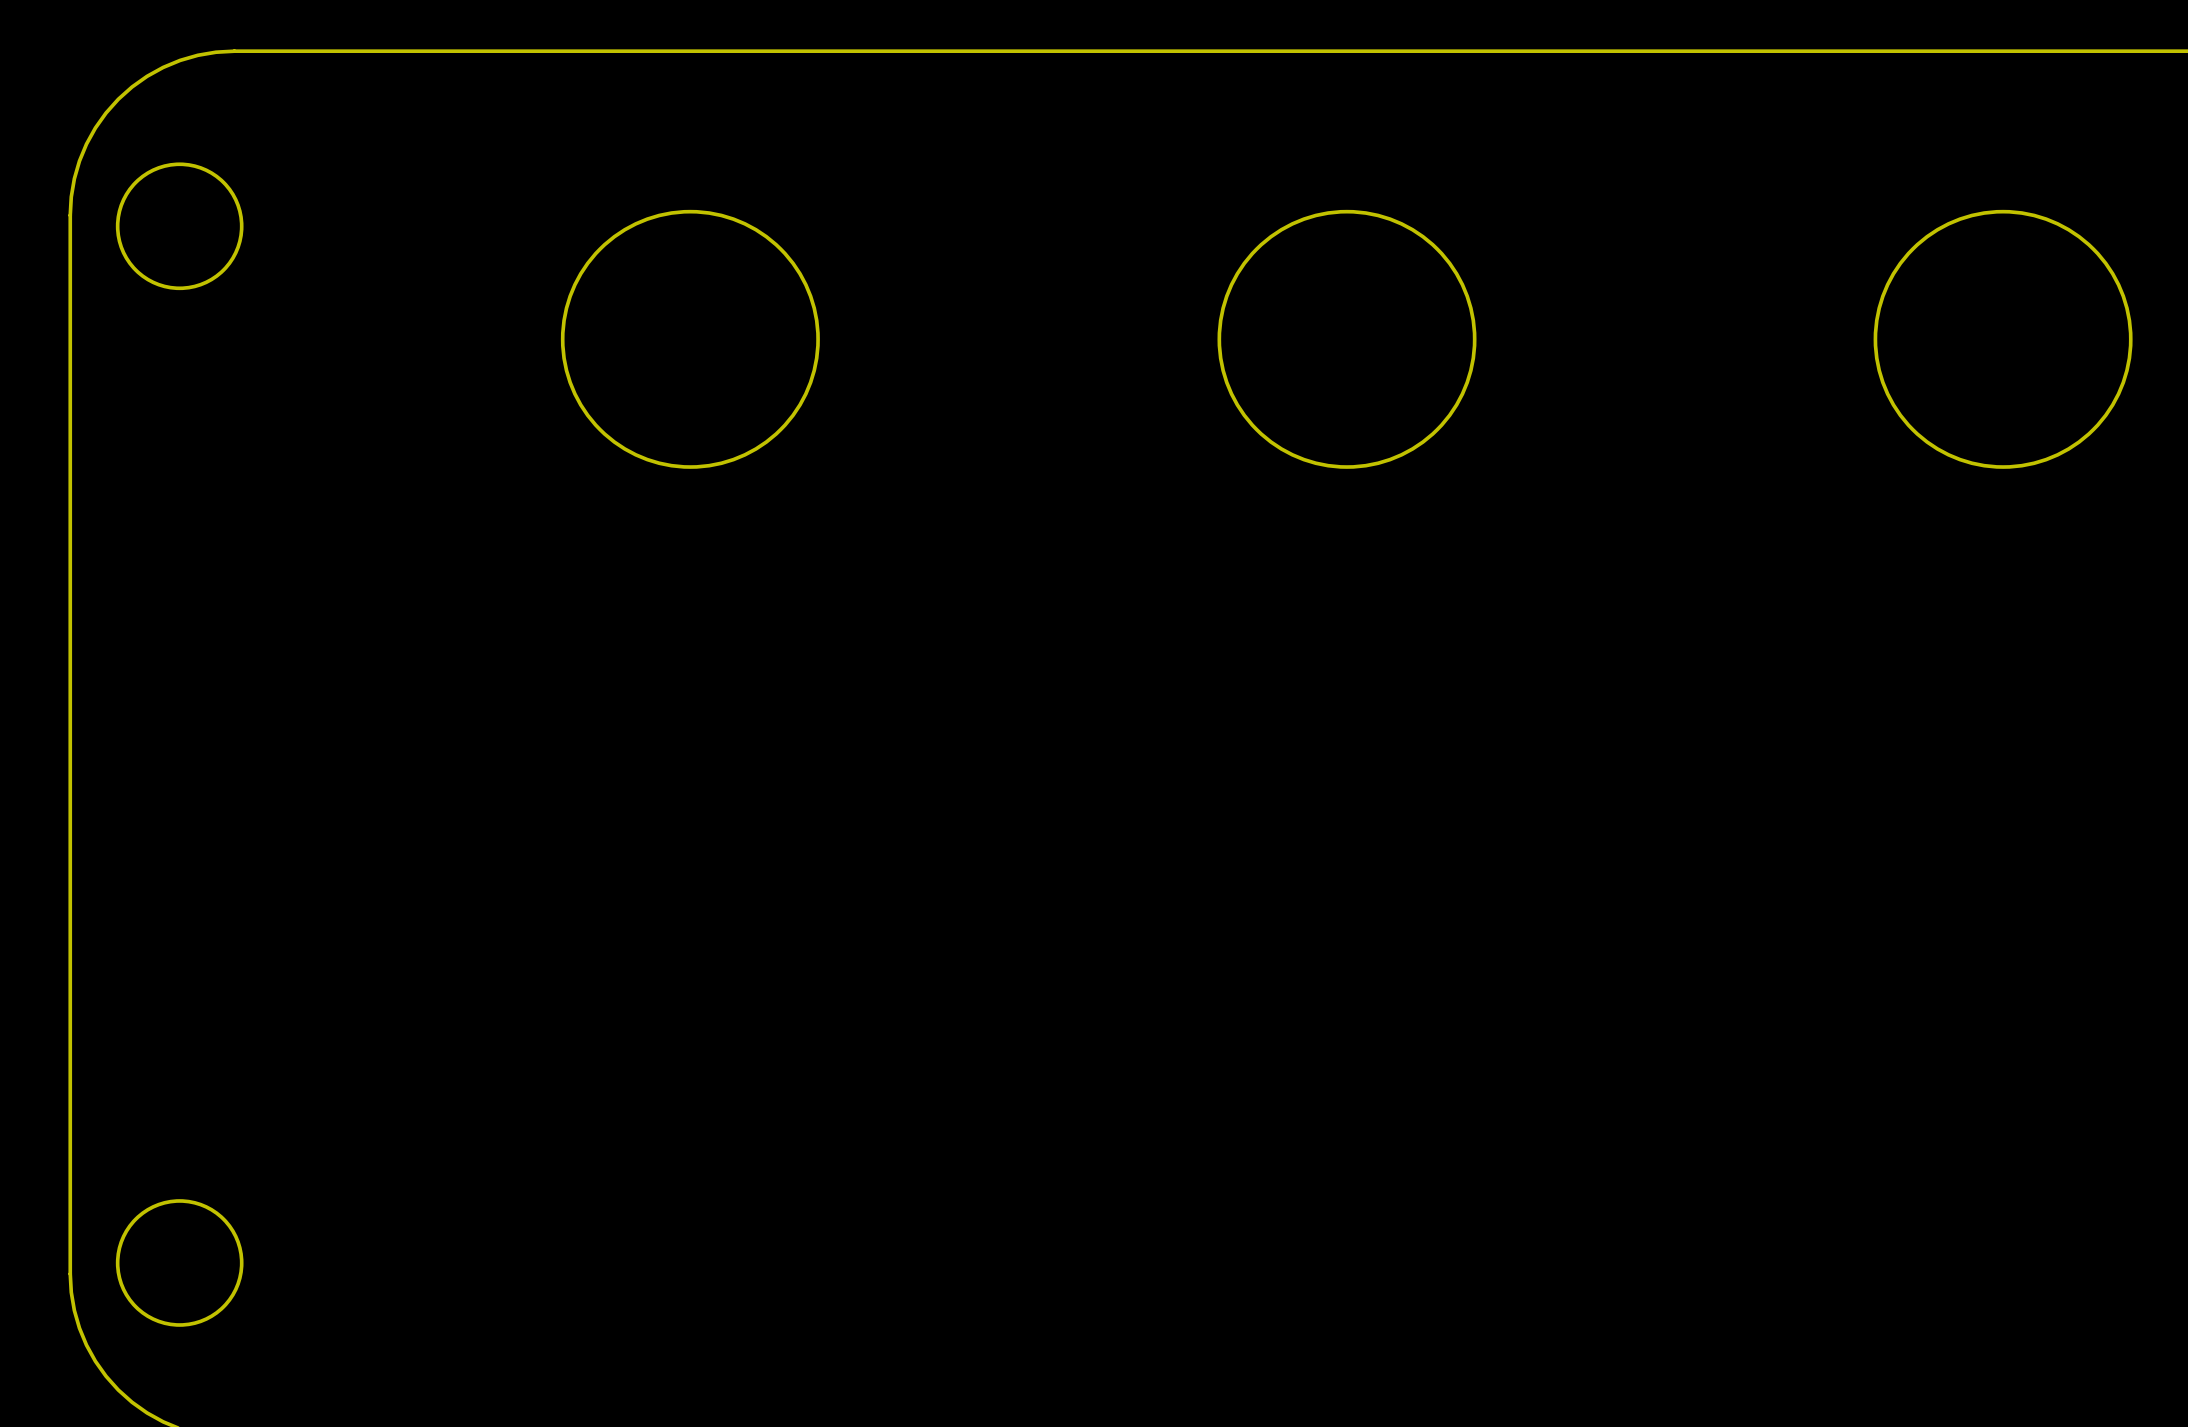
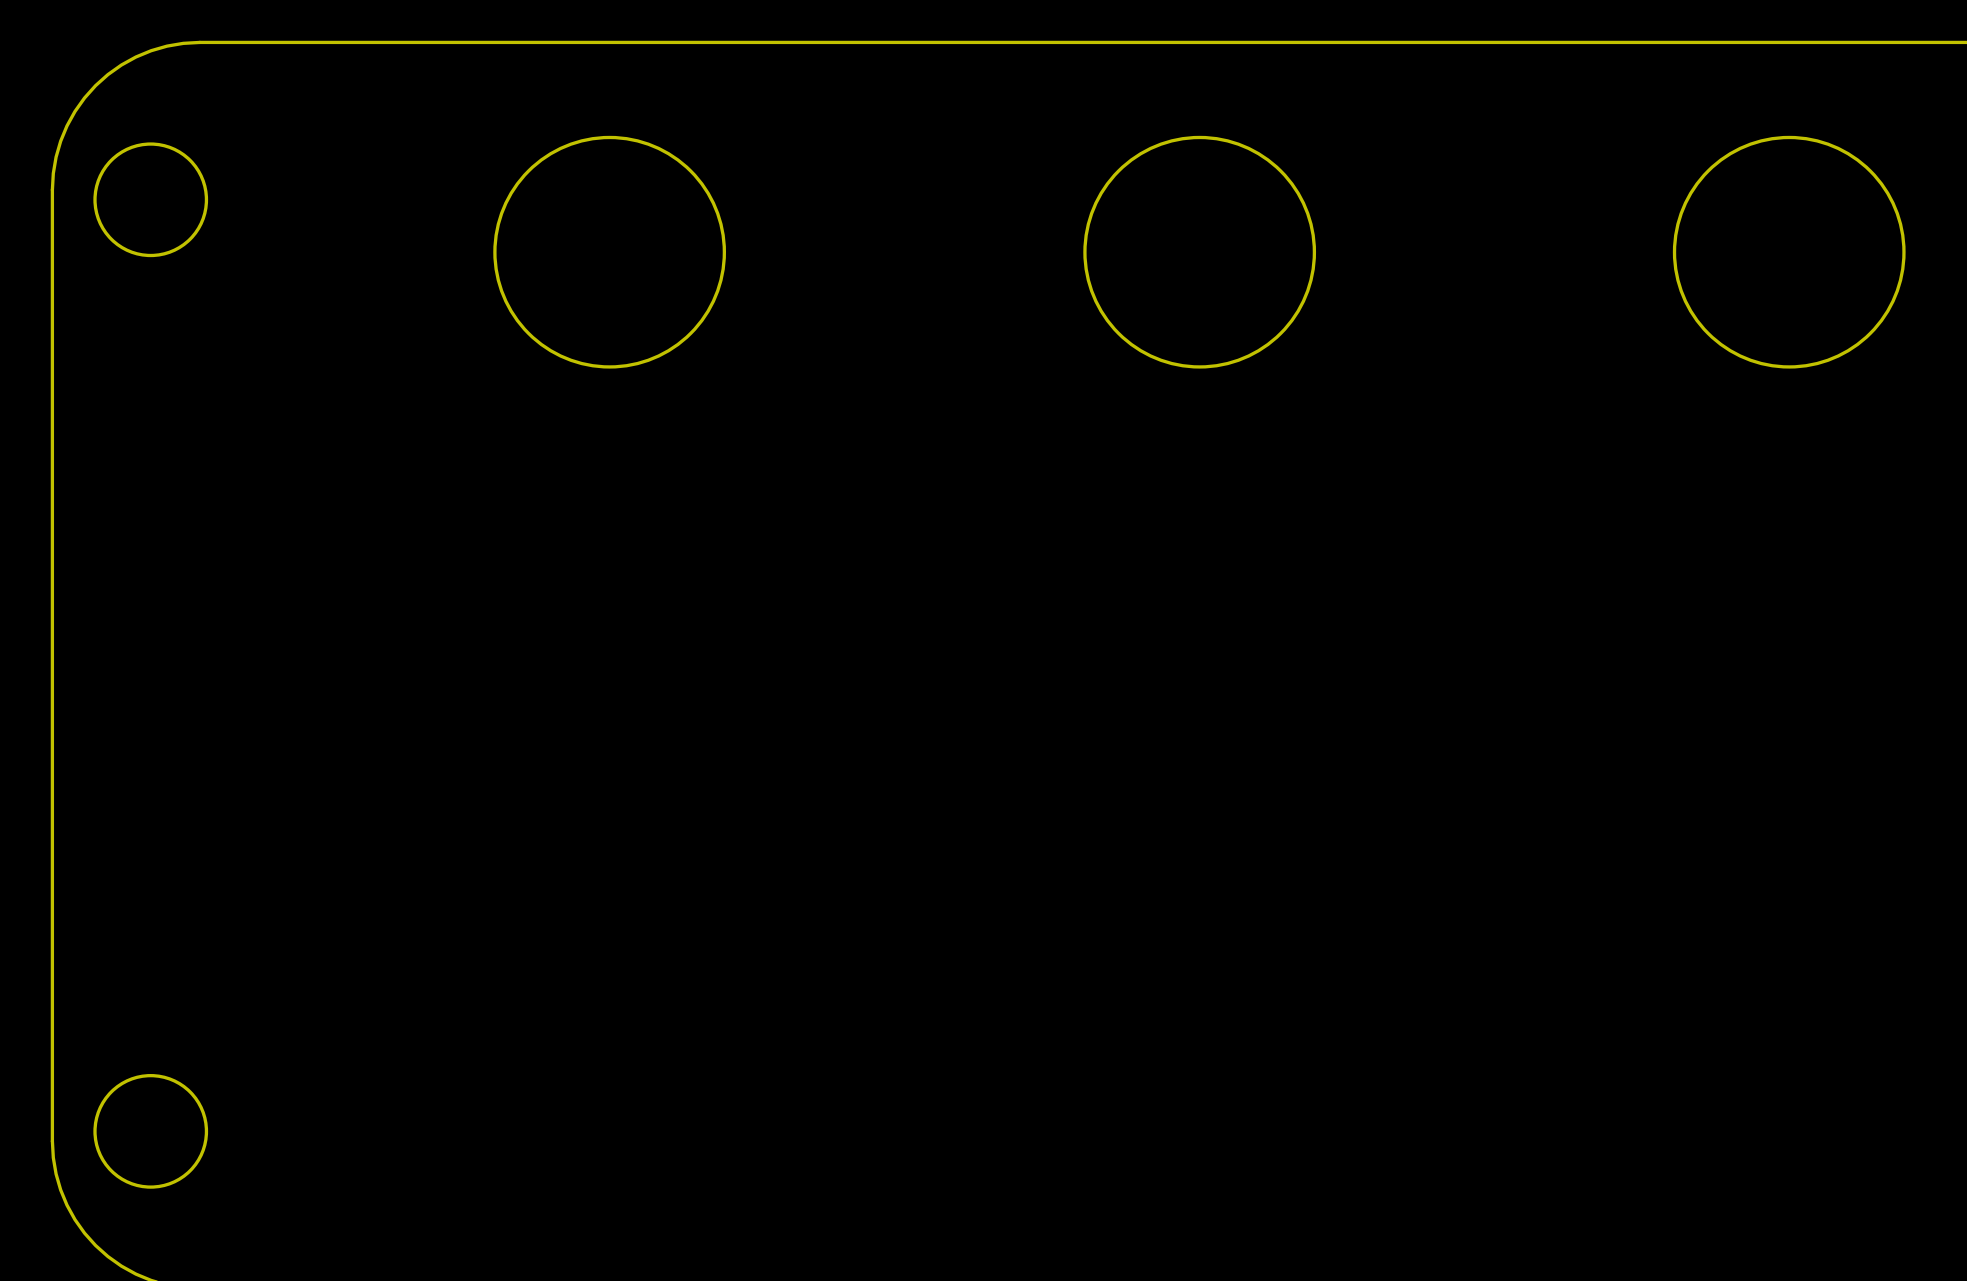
round board edge position: (690, 339) -> (609, 252)
round board edge position: (1346, 339) -> (1199, 252)
round board edge position: (2003, 339) -> (1789, 252)

